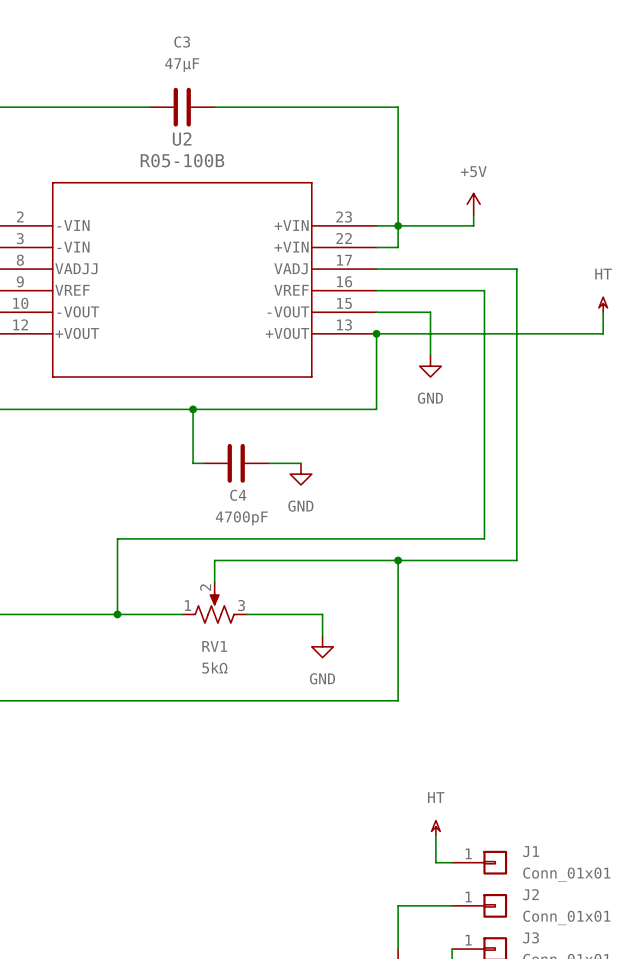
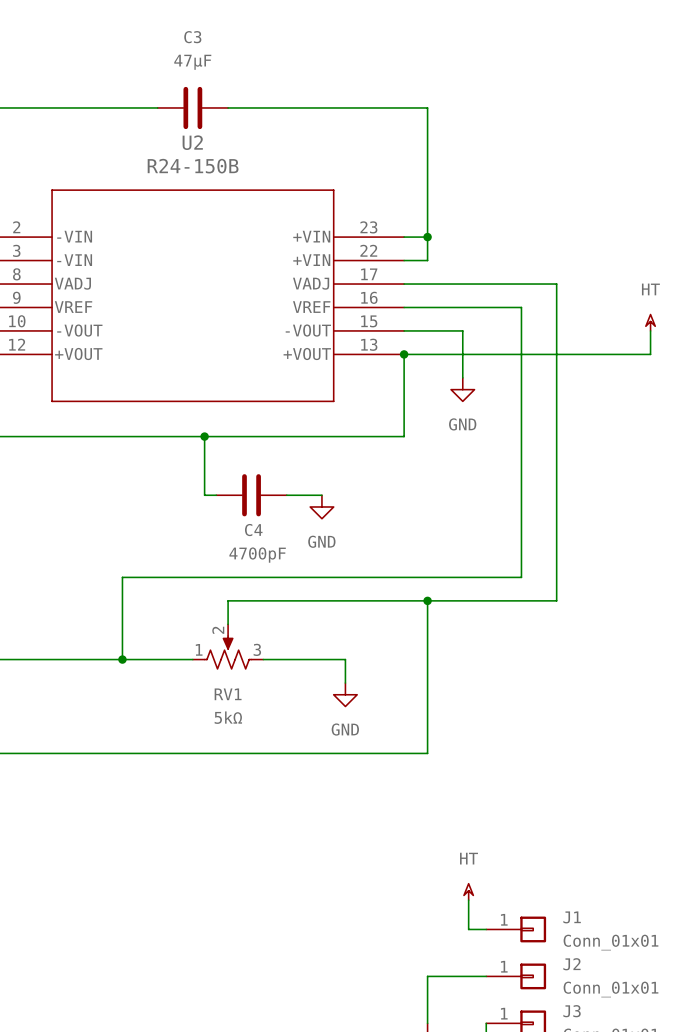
U2 value: R05-100B (182, 160) -> R24-150B (193, 166)
power symbol: +5V (473, 204) -> none
wire: (473, 215) (473, 225) (398, 225) -> none
U2 pin name: VADJJ (76, 268) -> VADJ (72, 283)

